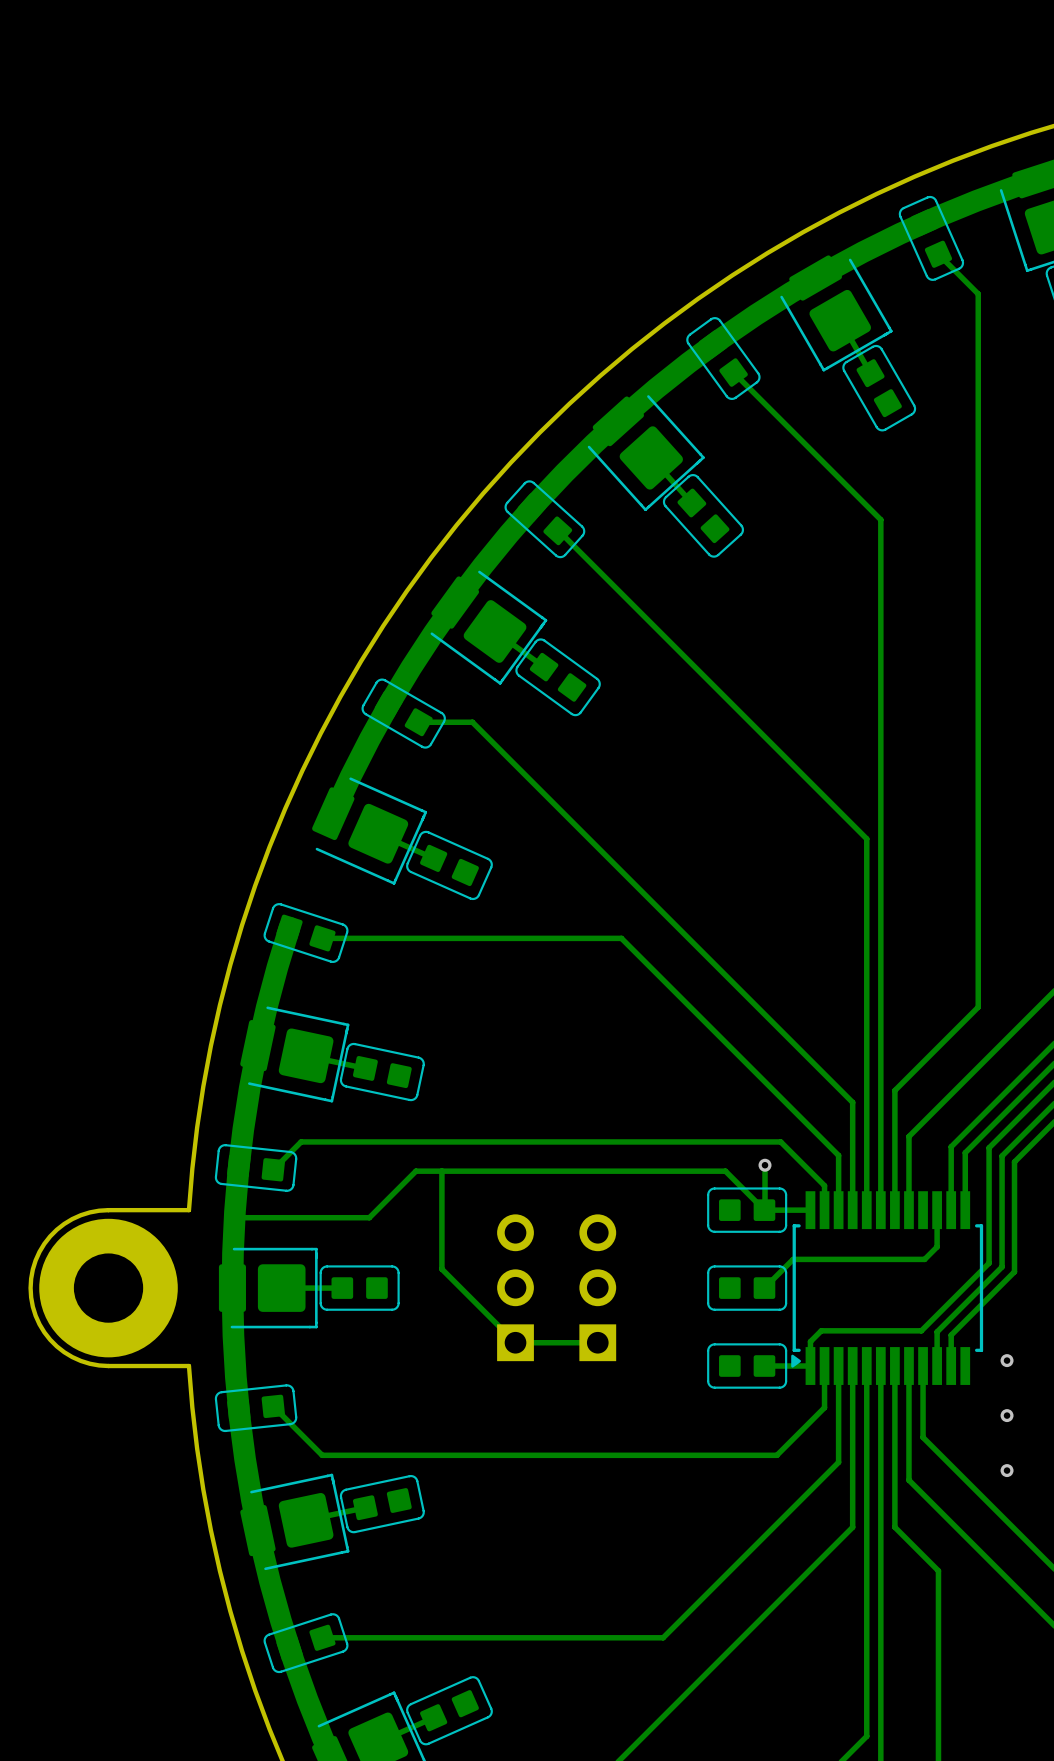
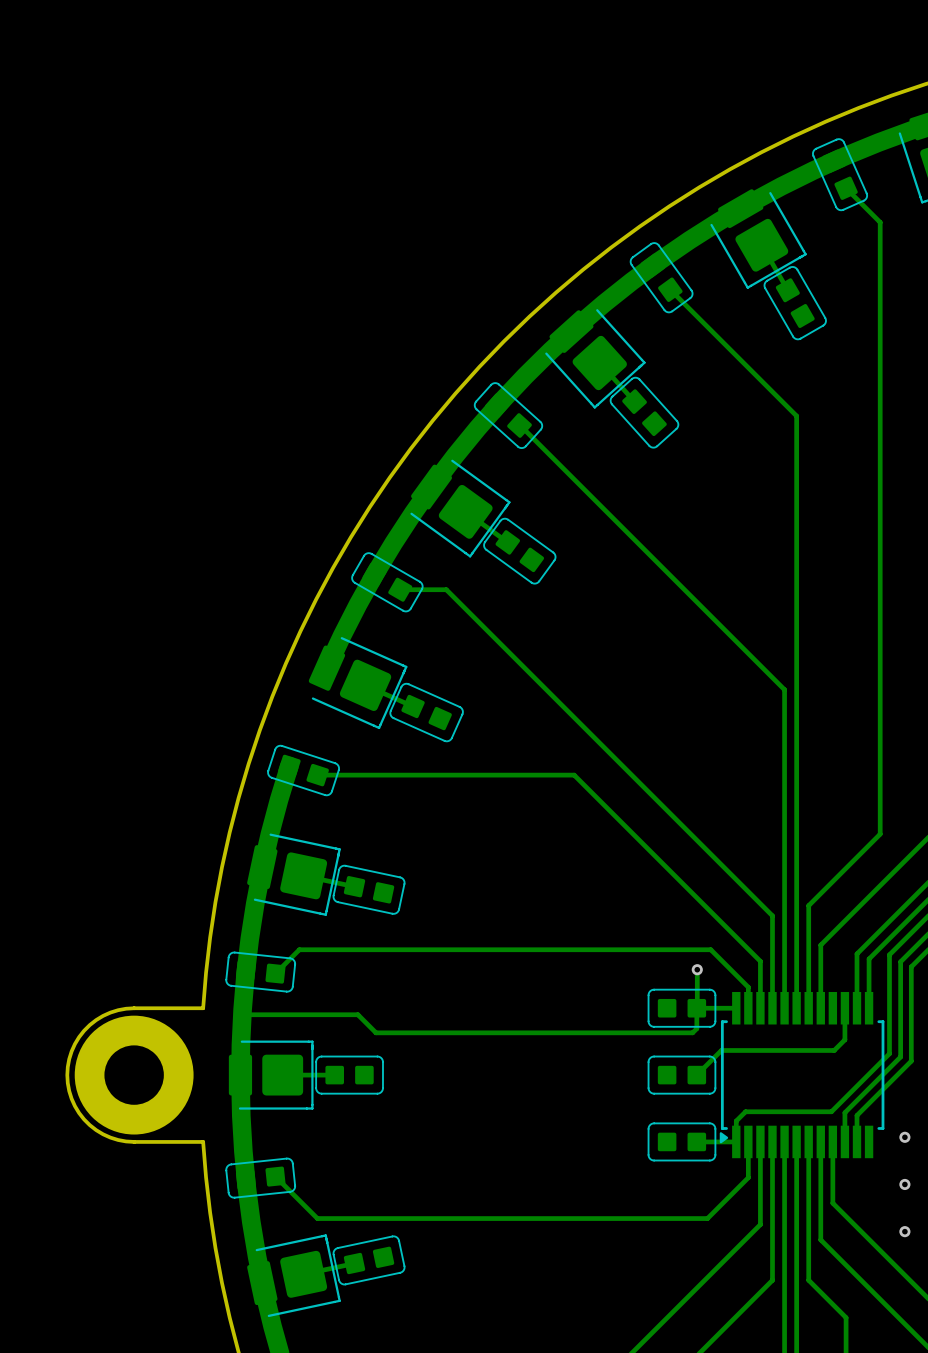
track: (441, 1171) (441, 1269) (515, 1342) (597, 1342) -> none
track: (764, 1210) (725, 1171) (415, 1171) (369, 1217) -> (696, 1008) (696, 1028) (692, 1032) (376, 1032) (357, 1014)
part: (515, 1287) -> none
part: (597, 1287) -> none

